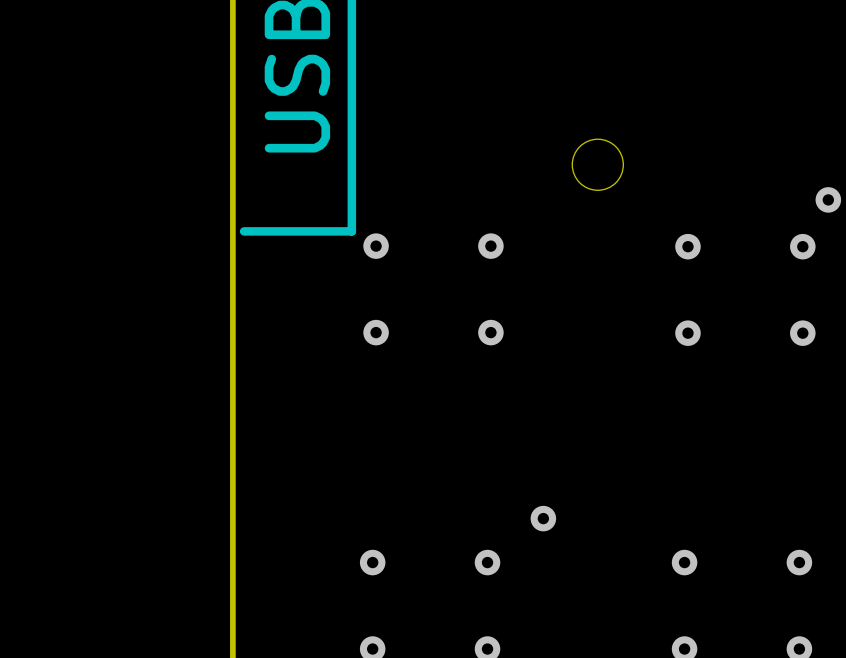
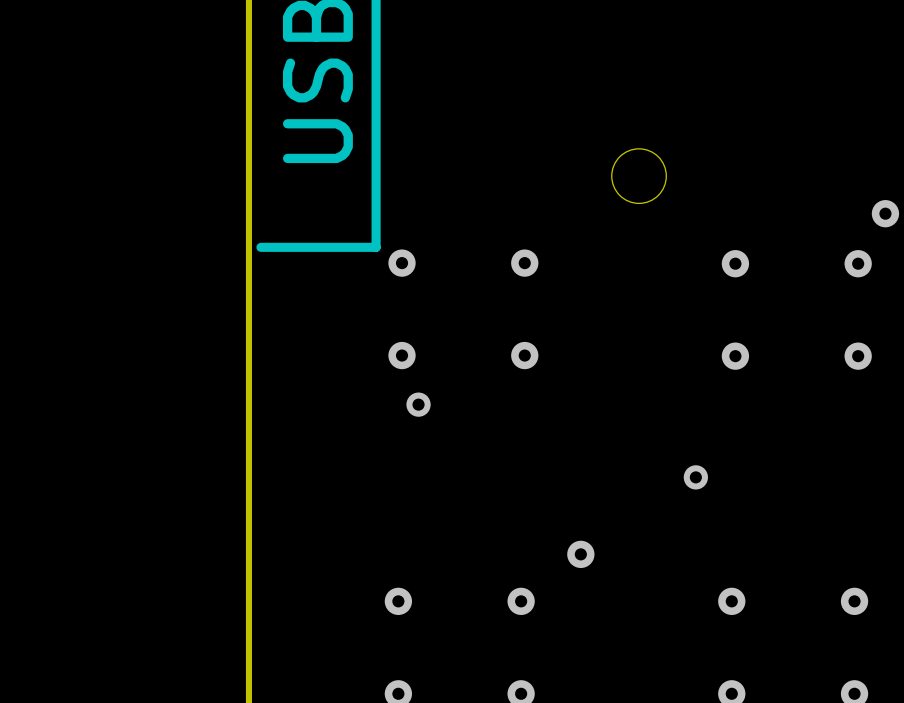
via: none -> (418, 404)
via: none -> (695, 477)

